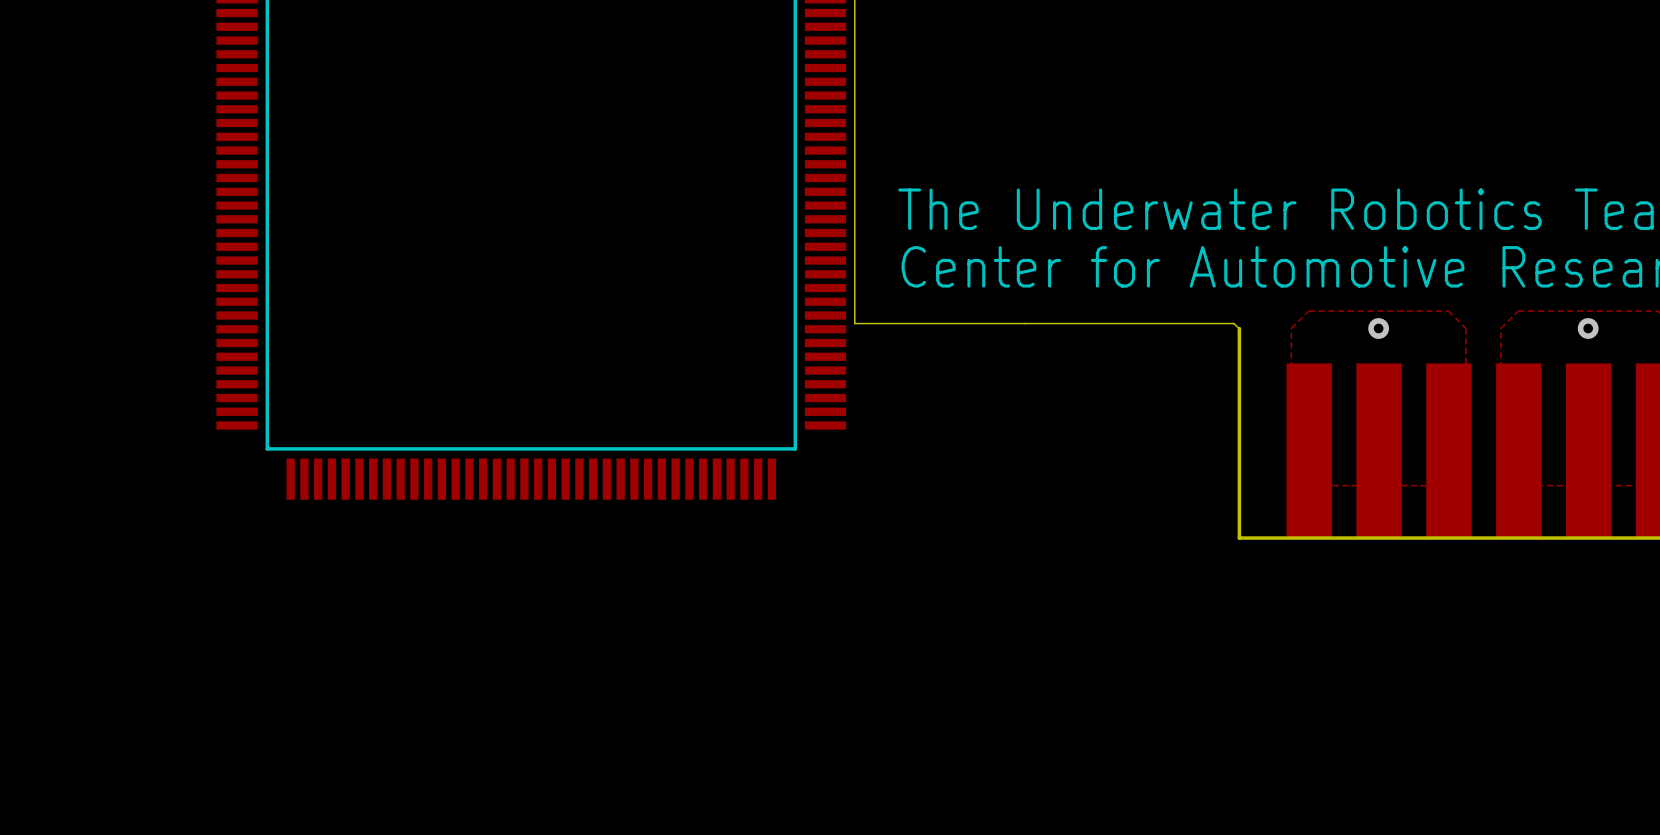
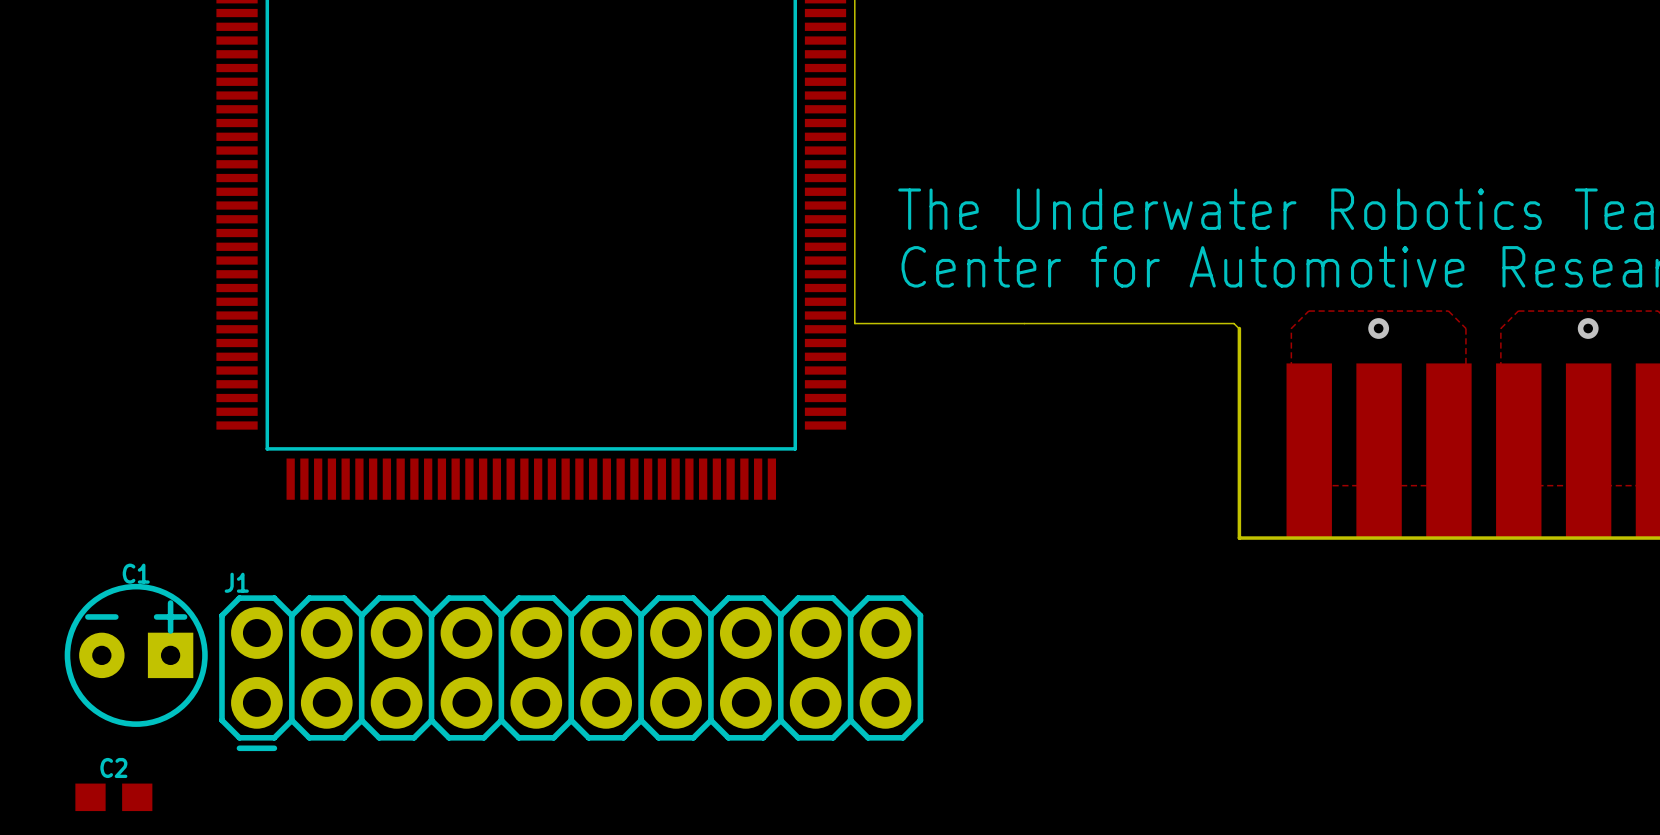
C1: none -> (136, 655)
J1: none -> (571, 673)
C2: none -> (113, 797)

